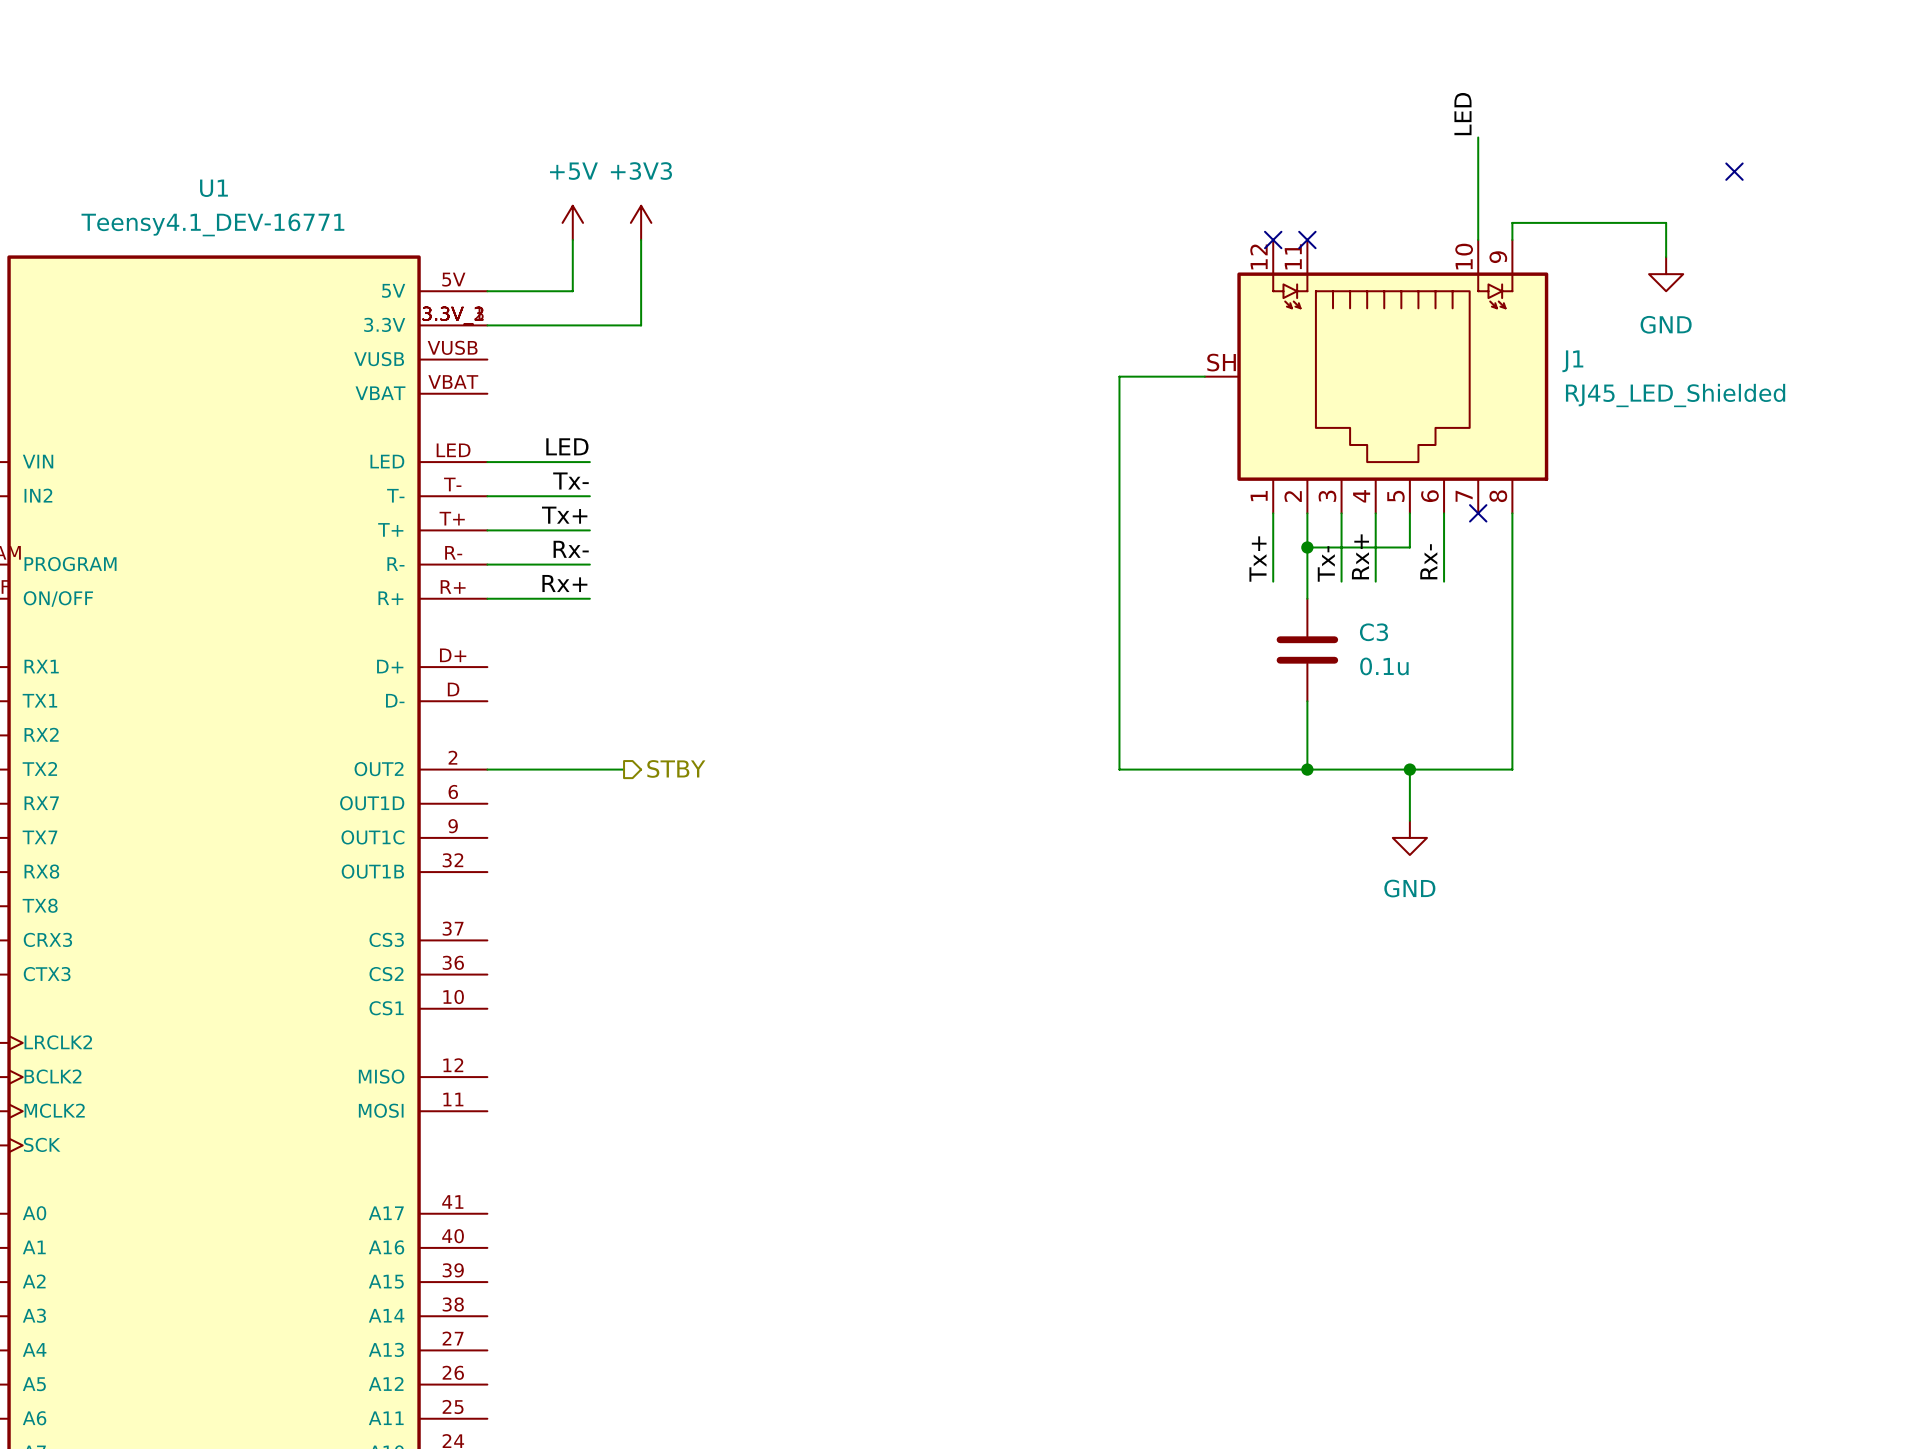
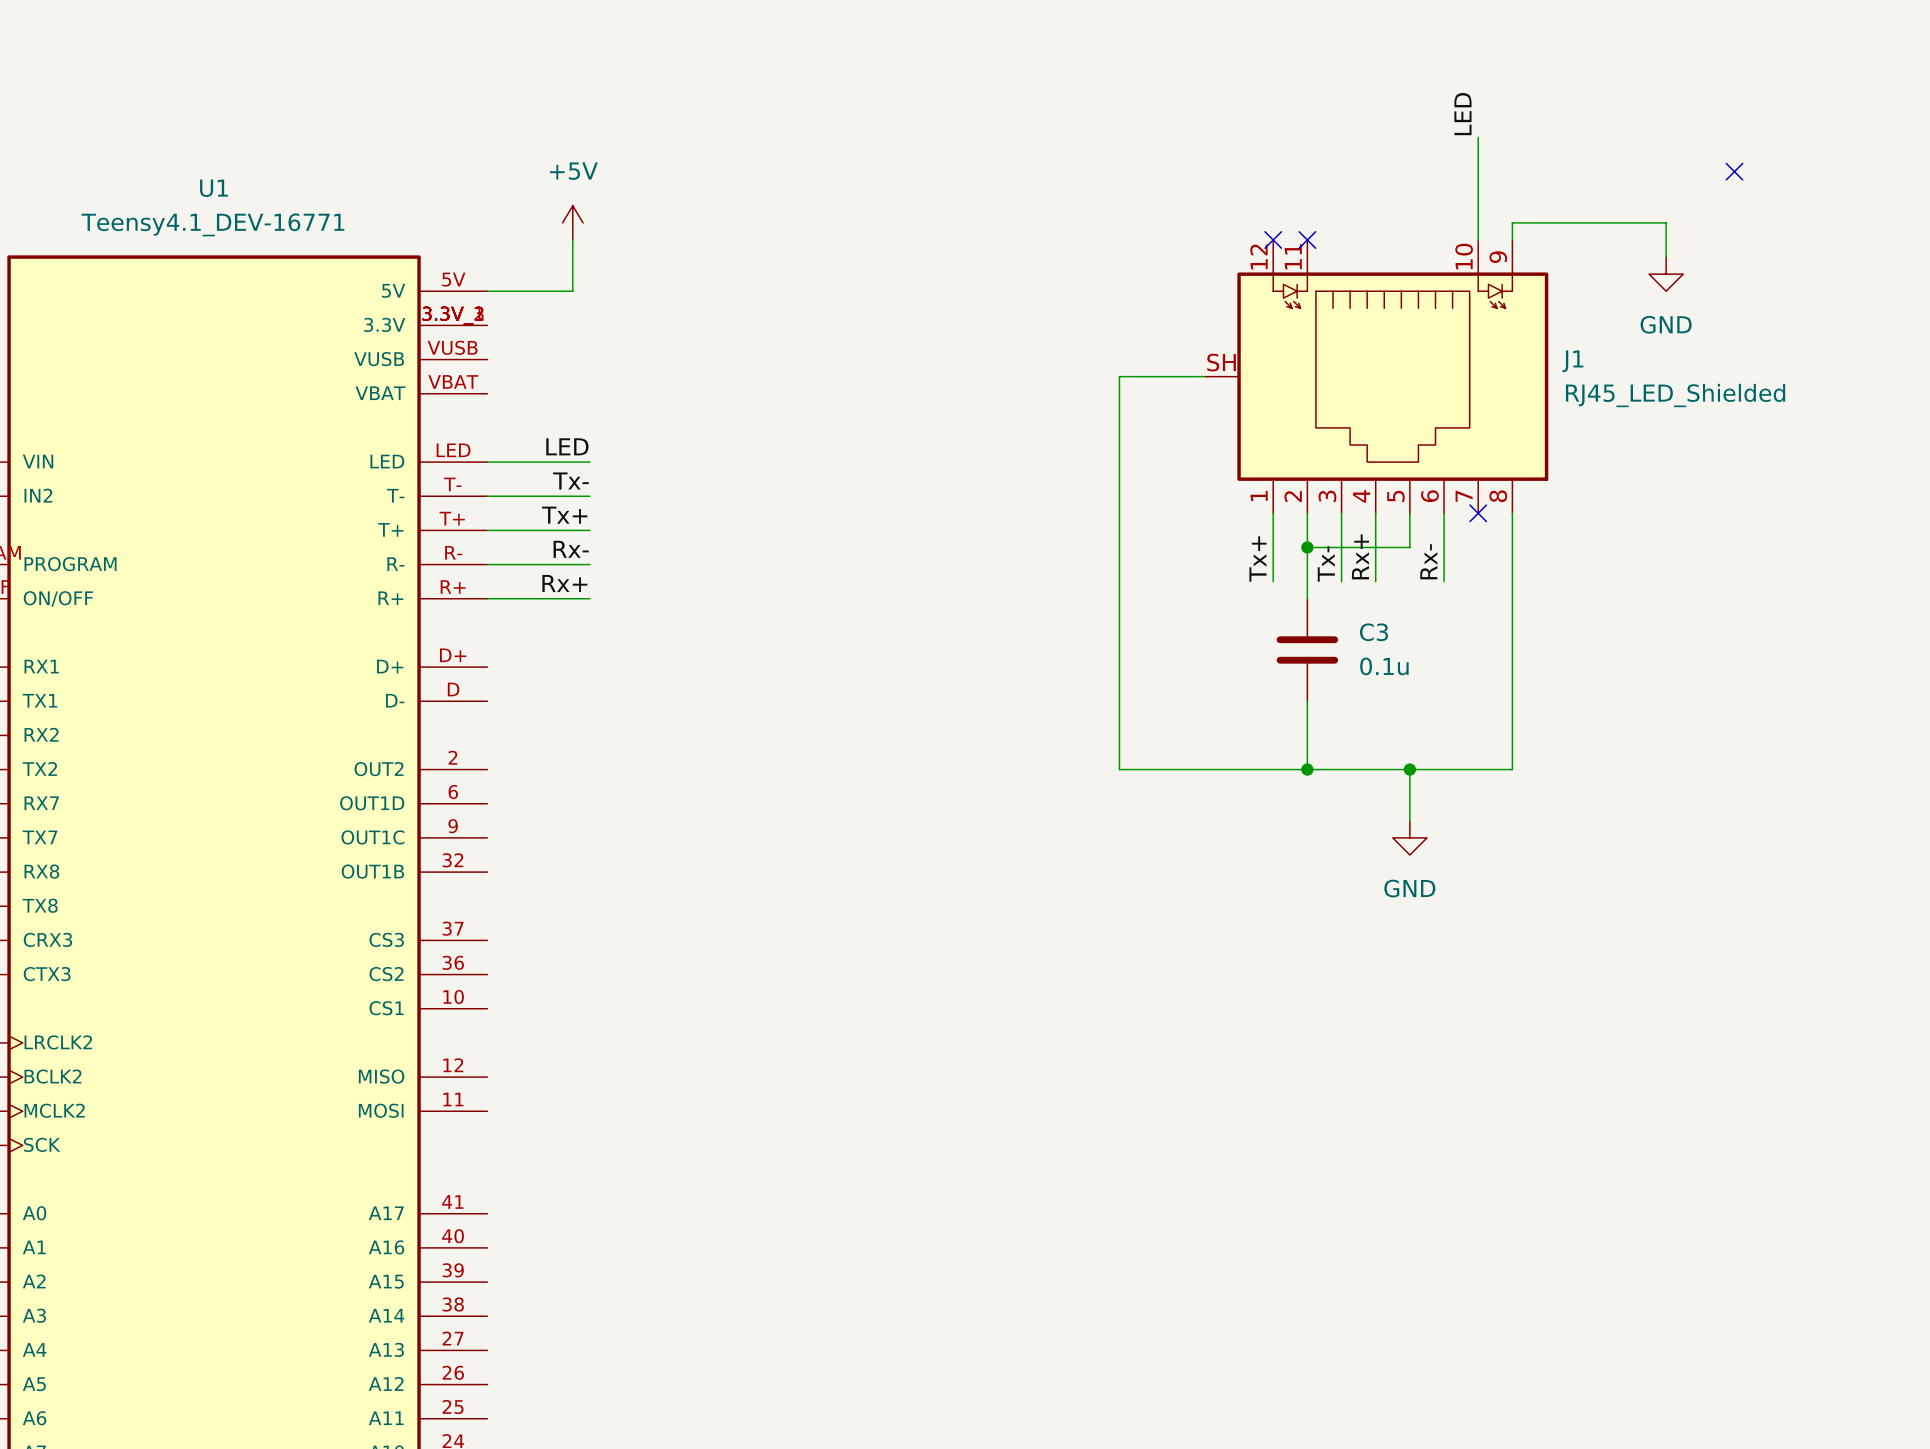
power symbol: +3V3 (641, 222) -> none
wire: (641, 239) (641, 325) (487, 325) -> none
hierarchical label: STBY (676, 768) -> none
wire: (487, 769) (624, 769) -> none

